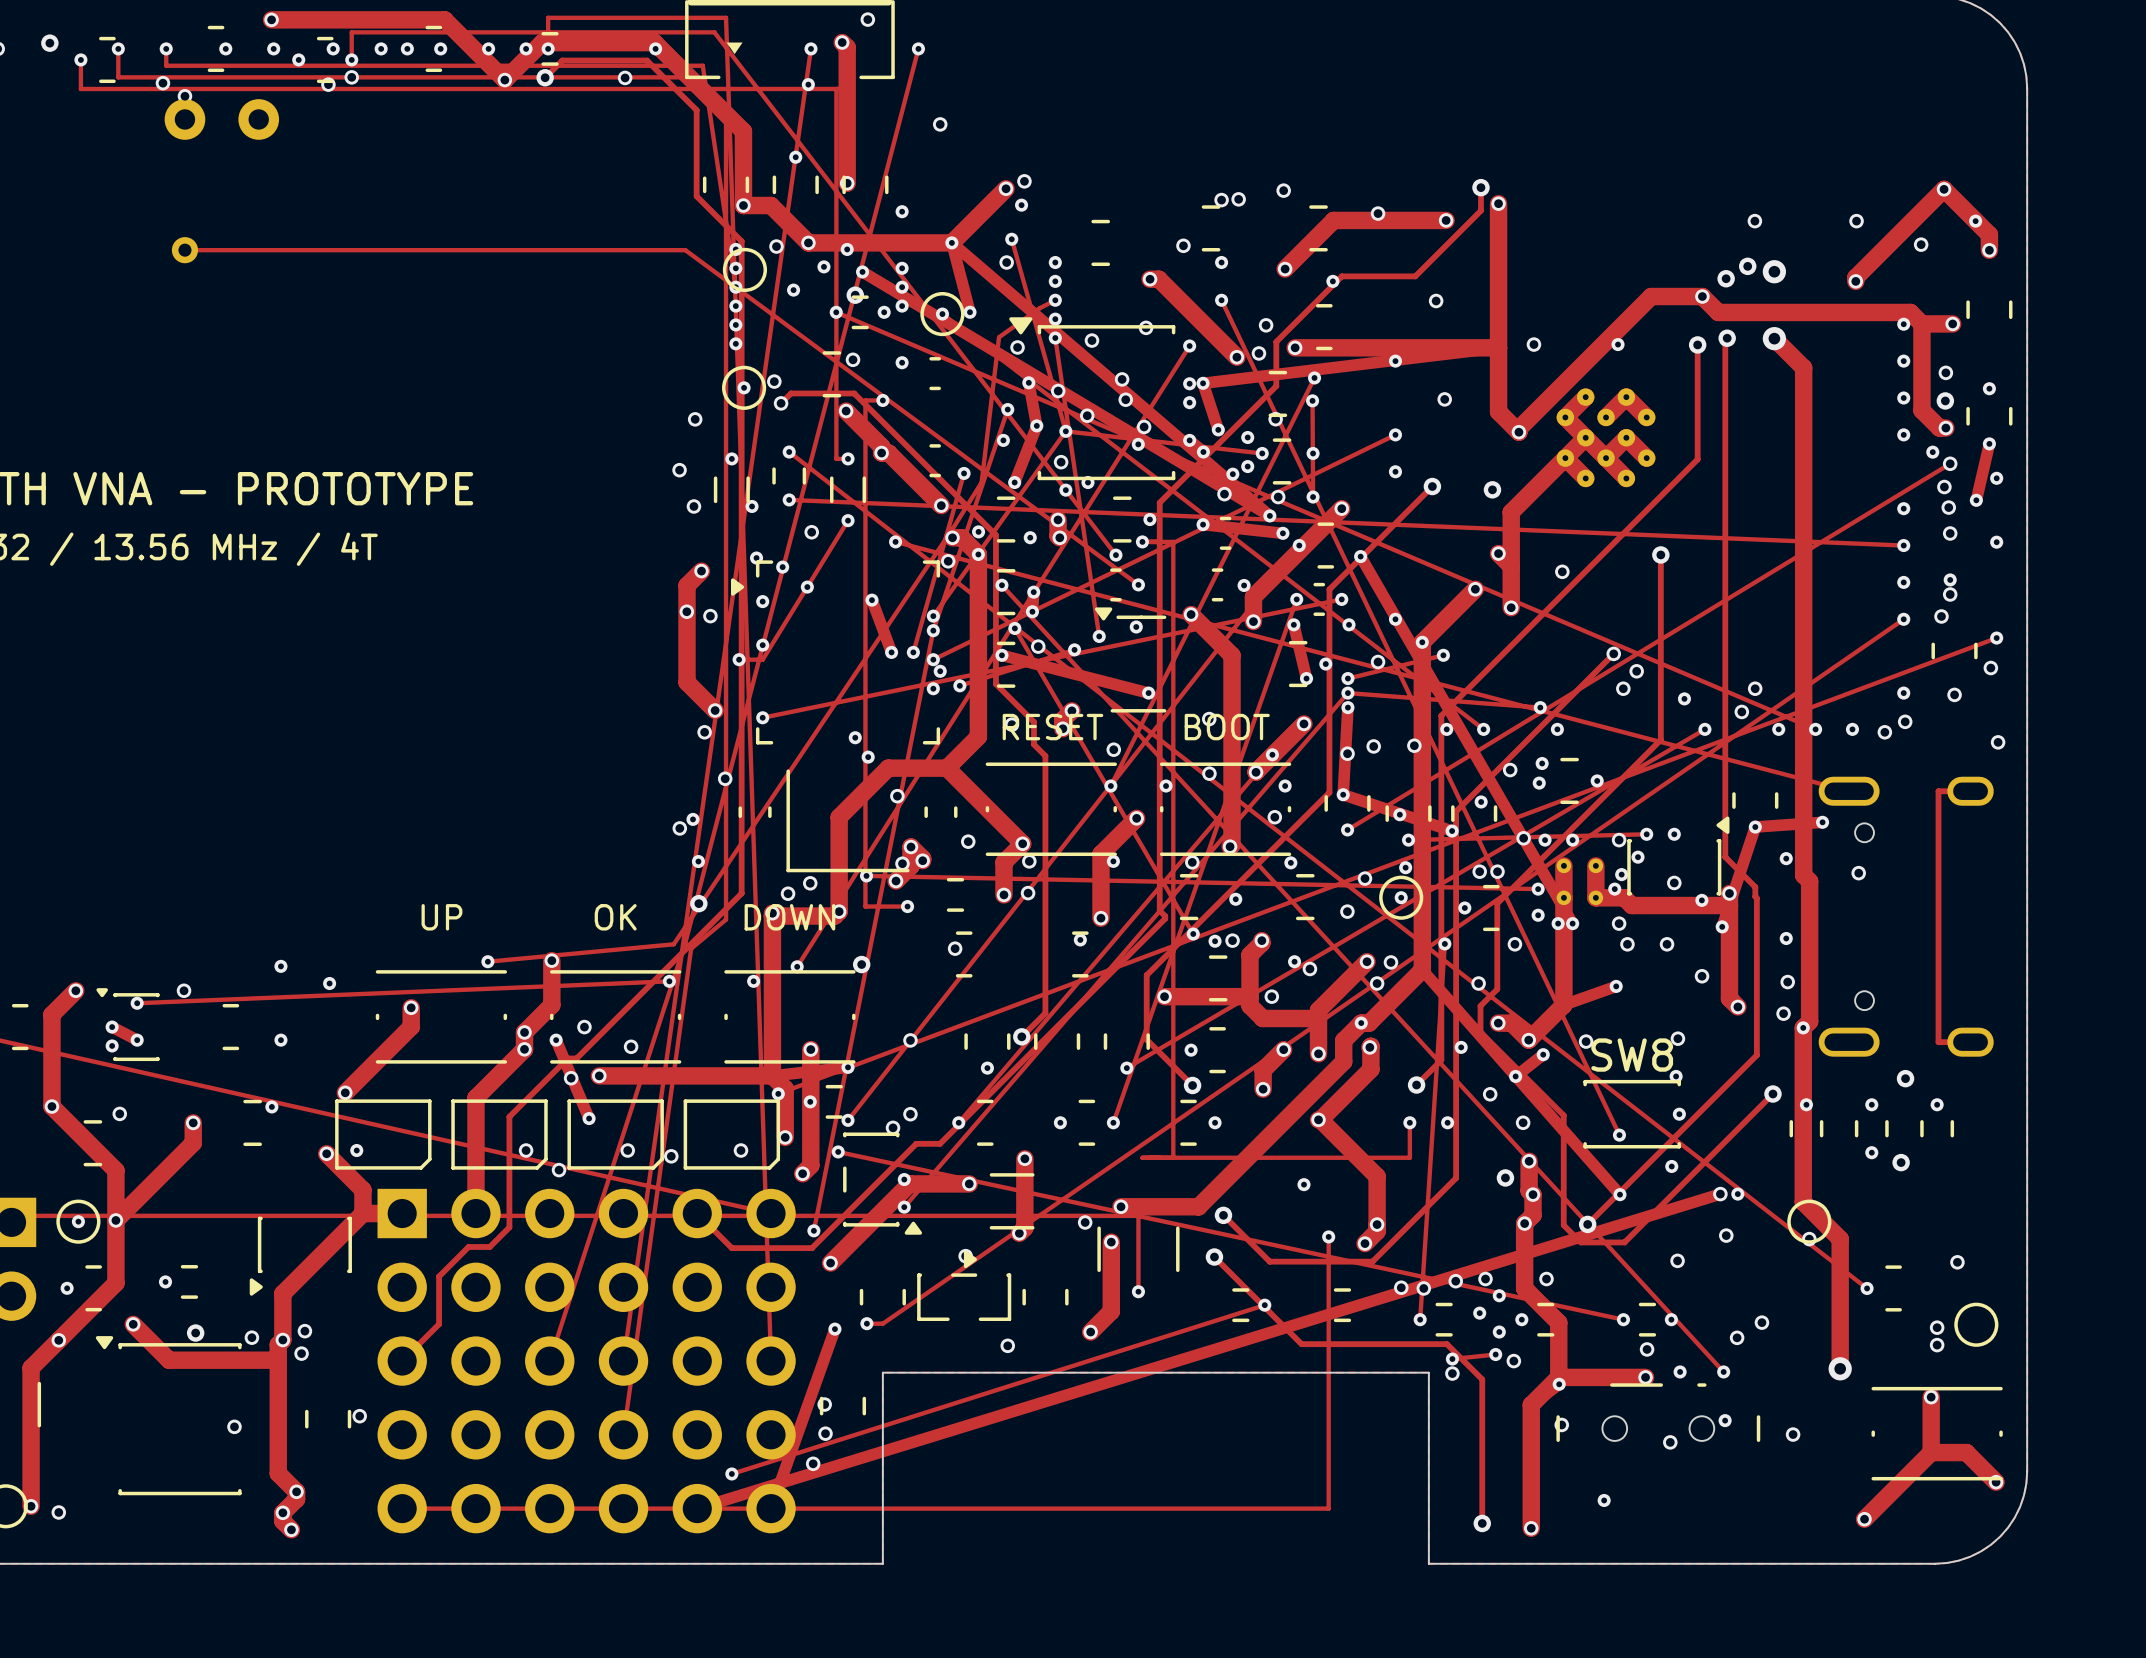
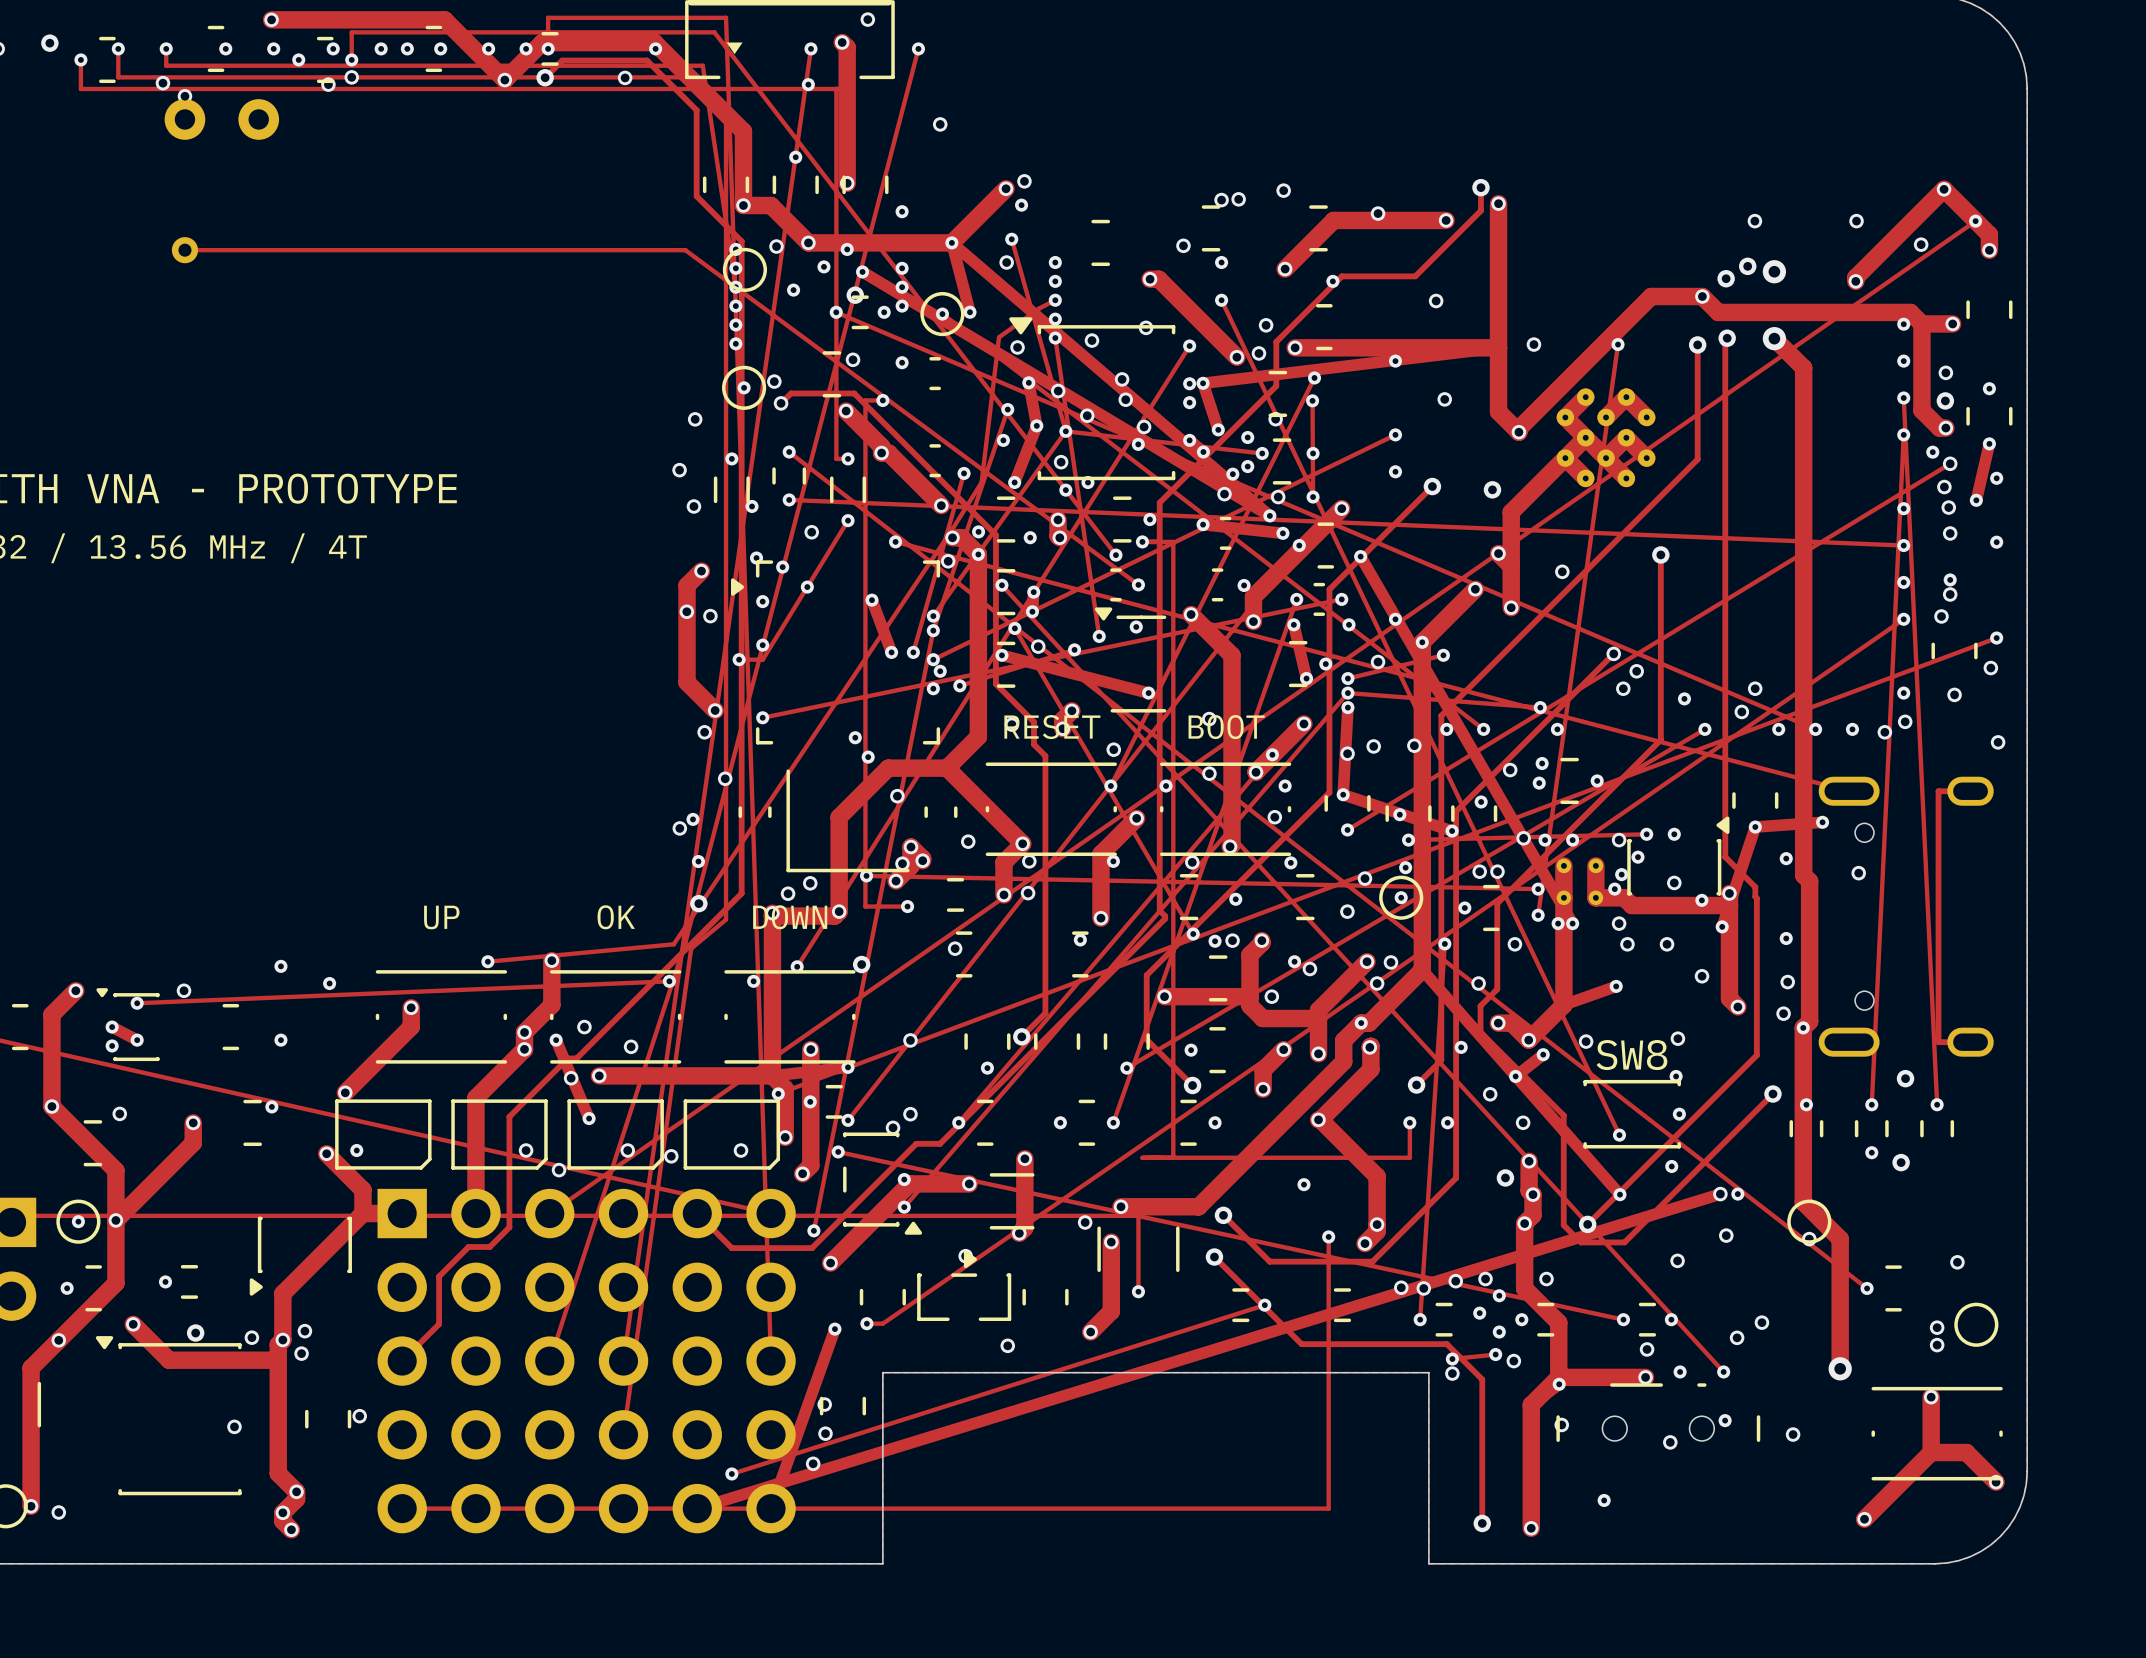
track: none -> (1975, 221) (549, 1213)
track: none -> (1618, 344) (1538, 915)
track: none -> (1903, 398) (1937, 1104)
track: none -> (1903, 434) (1871, 1104)

